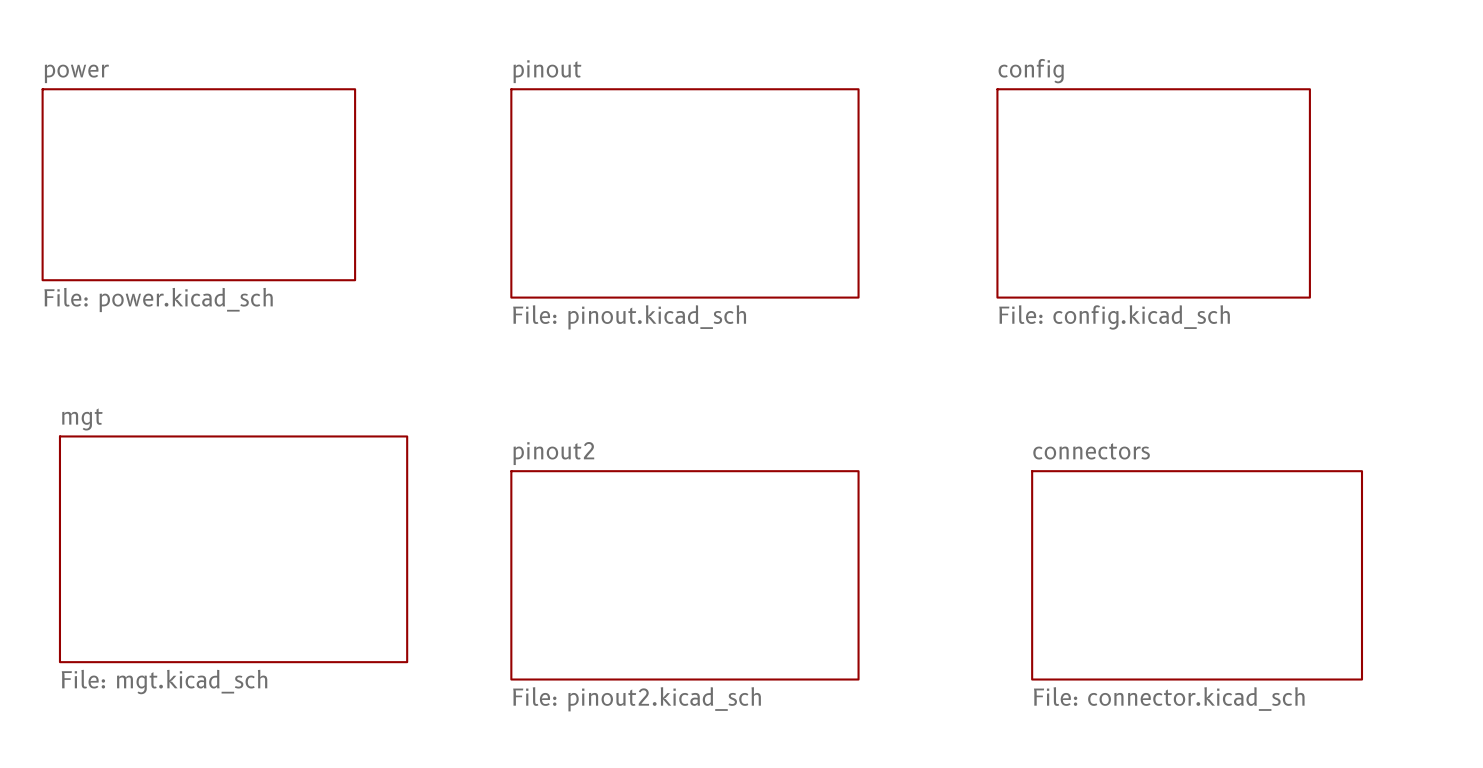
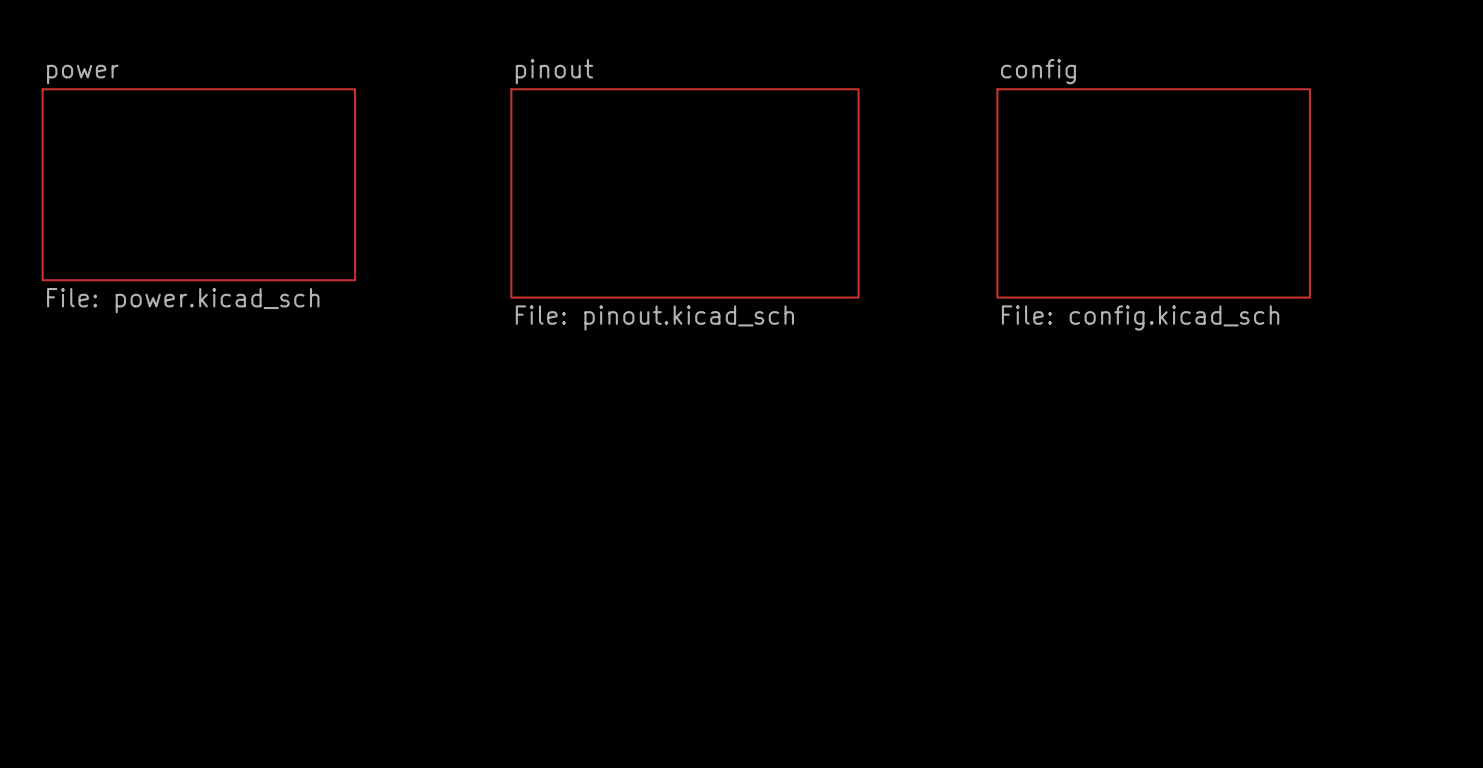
sheet mgt: File: mgt.kicad_sch (233, 549) -> none
sheet pinout2: File: pinout2.kicad_sch (684, 575) -> none
sheet connectors: File: connector.kicad_sch (1197, 575) -> none

